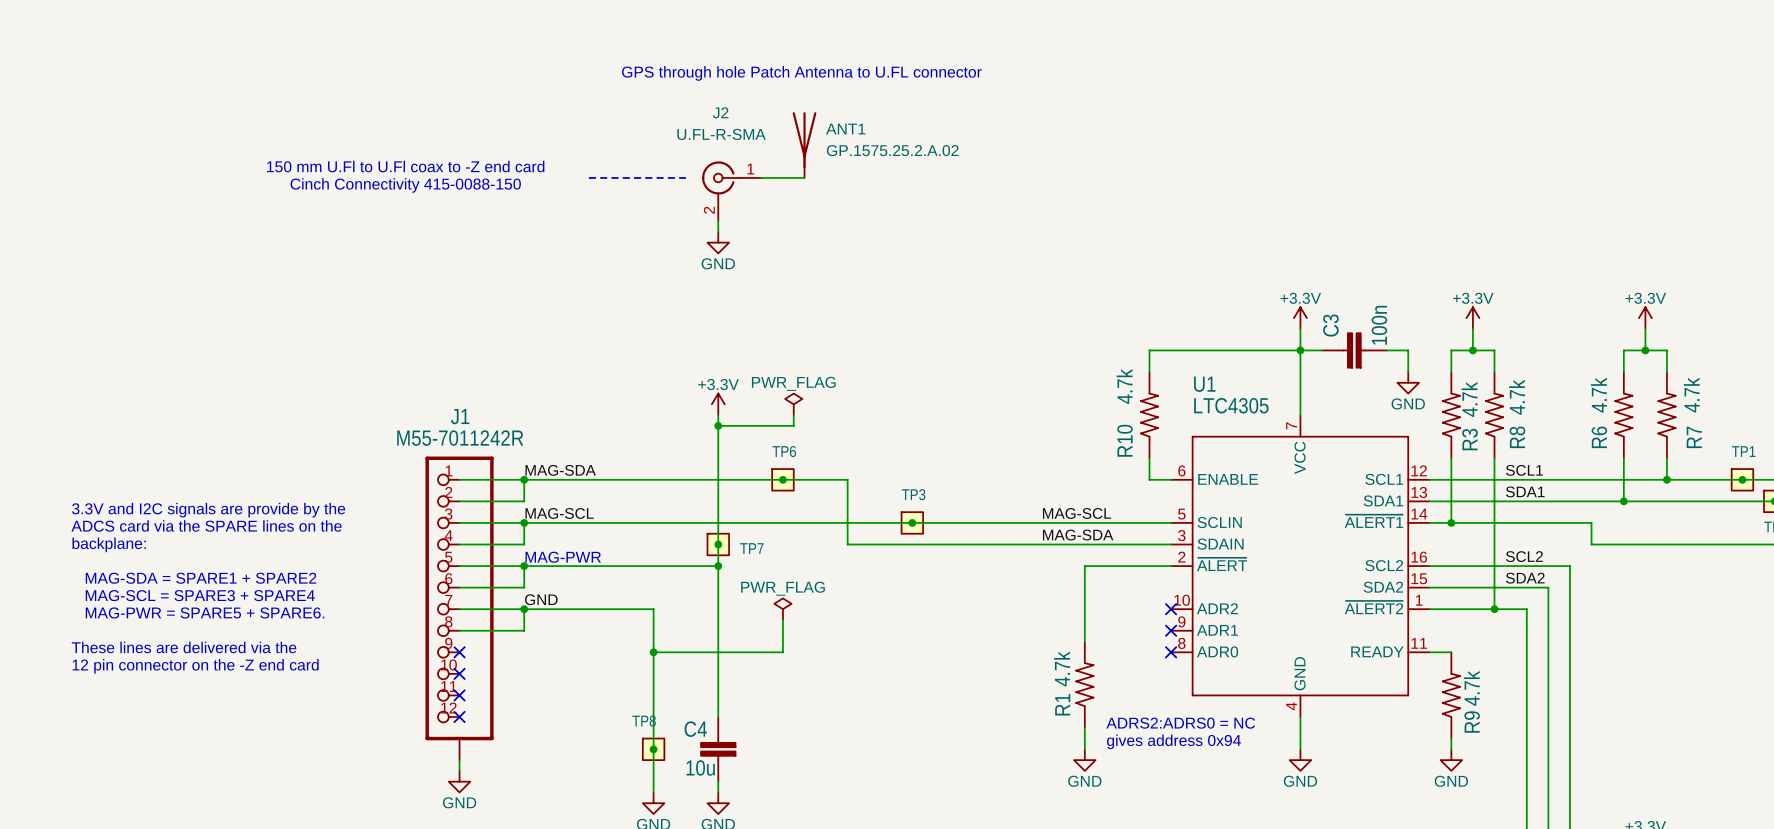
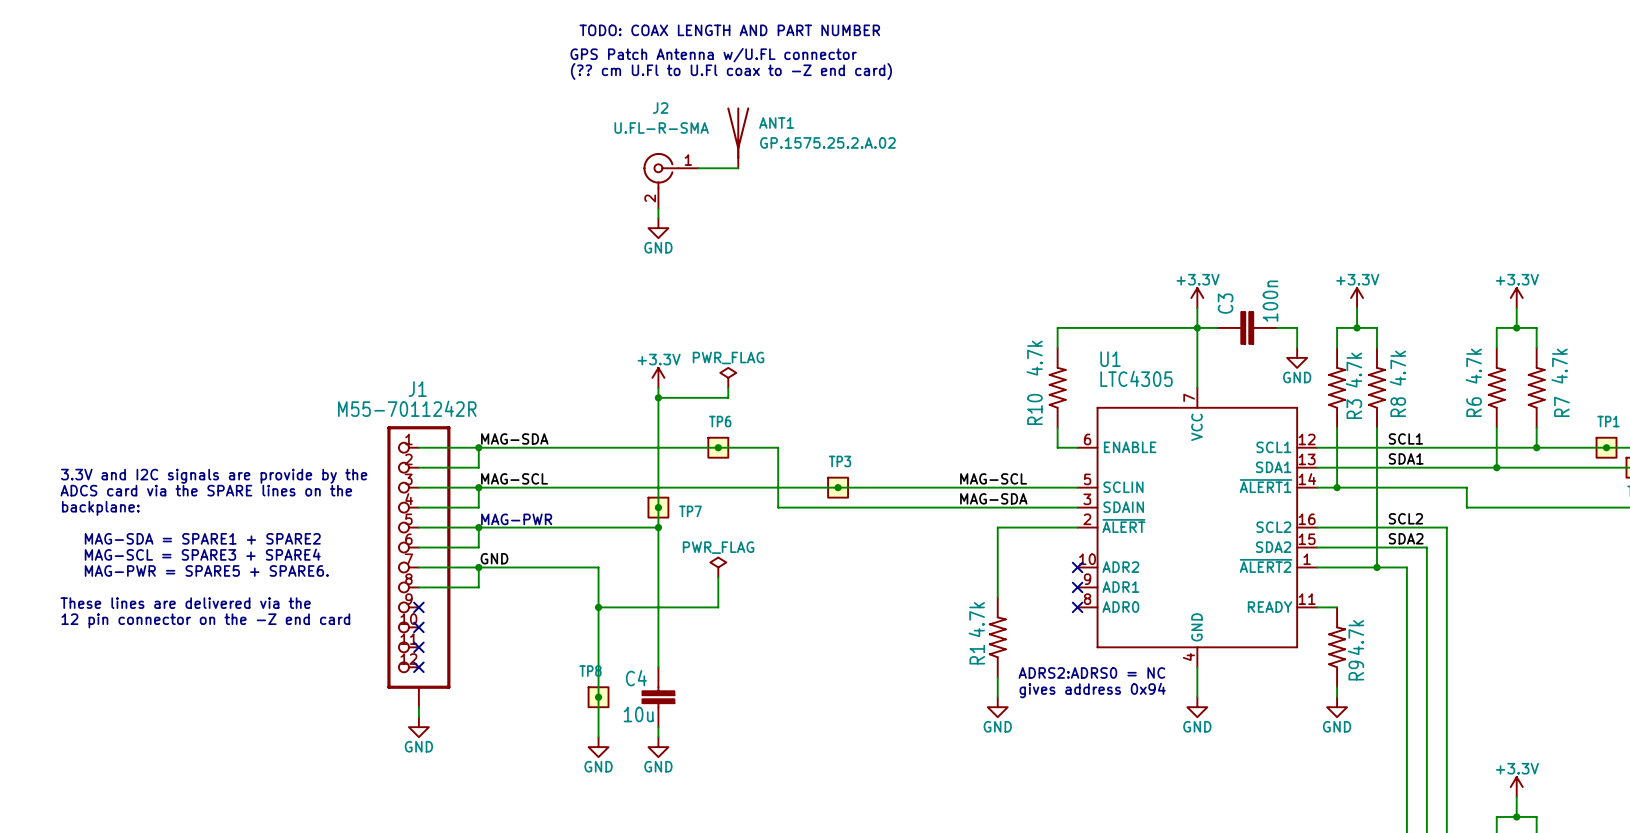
text: none -> TODO: COAX LENGTH AND PART NUMBER (729, 30)
text: none -> GPS Patch Antenna w/U.FL connector (713, 55)
text: GPS through hole Patch Antenna to U.FL connector (801, 73) -> (?? cm U.Fl to U.Fl coax to -Z end card) (731, 71)
text: 150 mm U.Fl to U.Fl coax to -Z end card (405, 166) -> none
line: (588, 177) (685, 177) -> none
text: Cinch Connectivity 415-0088-150 (405, 185) -> none

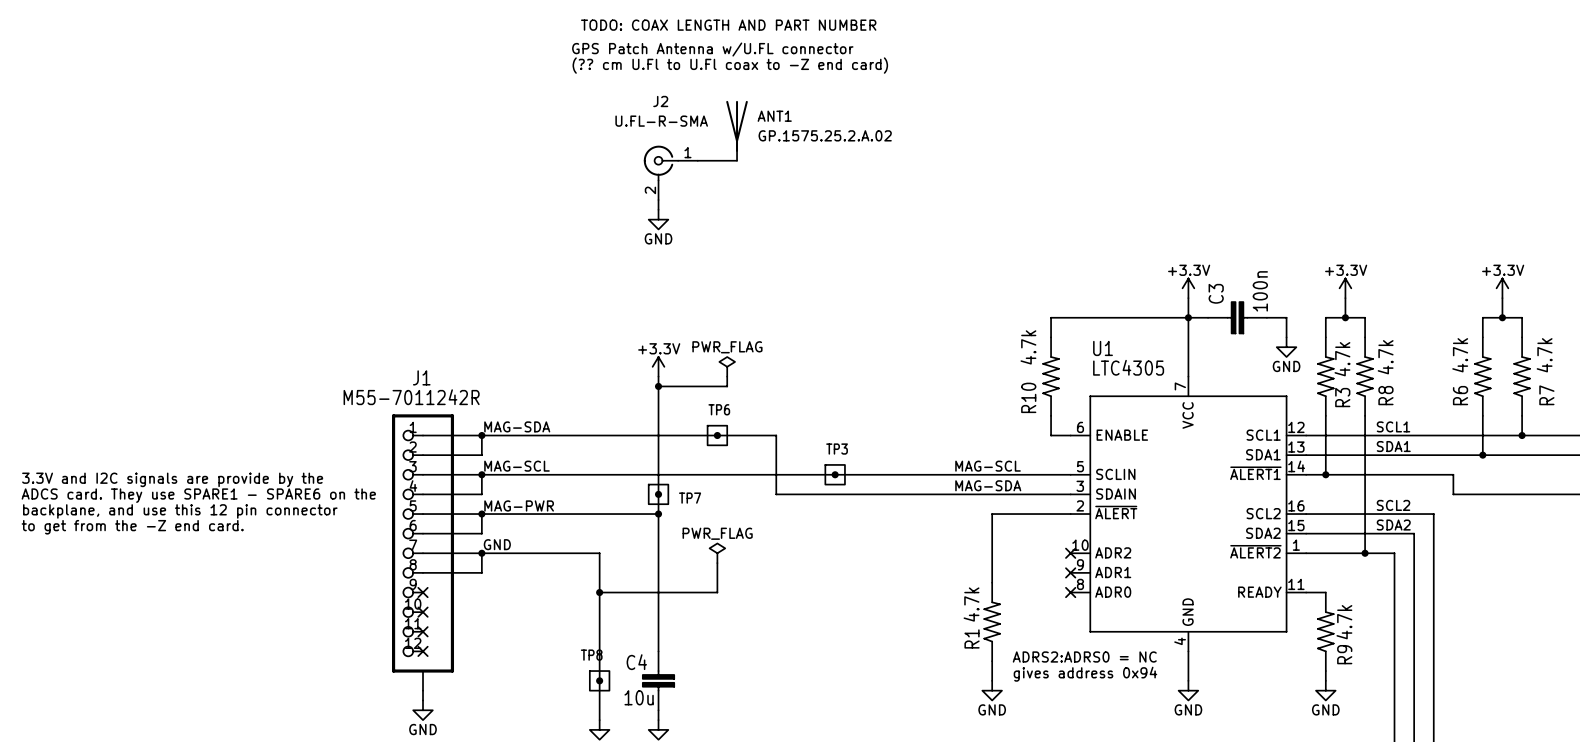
text position: 3.3V and I2C signals are provide by the (214, 476) -> 3.3V and I2C signals are provide by the (172, 479)
text: ADCS card via the SPARE lines on the (206, 490) -> ADCS card. They use SPARE1 - SPARE6 on the (198, 495)
text: backplane: (100, 508) -> none
text: none -> backplane, and use this 12 pin connector (180, 511)
text: MAG-SDA = SPARE1 + SPARE2 (202, 538) -> none
text: none -> to get from the -Z end card. (132, 527)
text: MAG-SCL = SPARE3 + SPARE4 (202, 554) -> none
text: MAG-PWR = SPARE5 + SPARE6. (206, 570) -> none
text: These lines are delivered via the (185, 603) -> none
text: 12 pin connector on the -Z end card (205, 620) -> none

